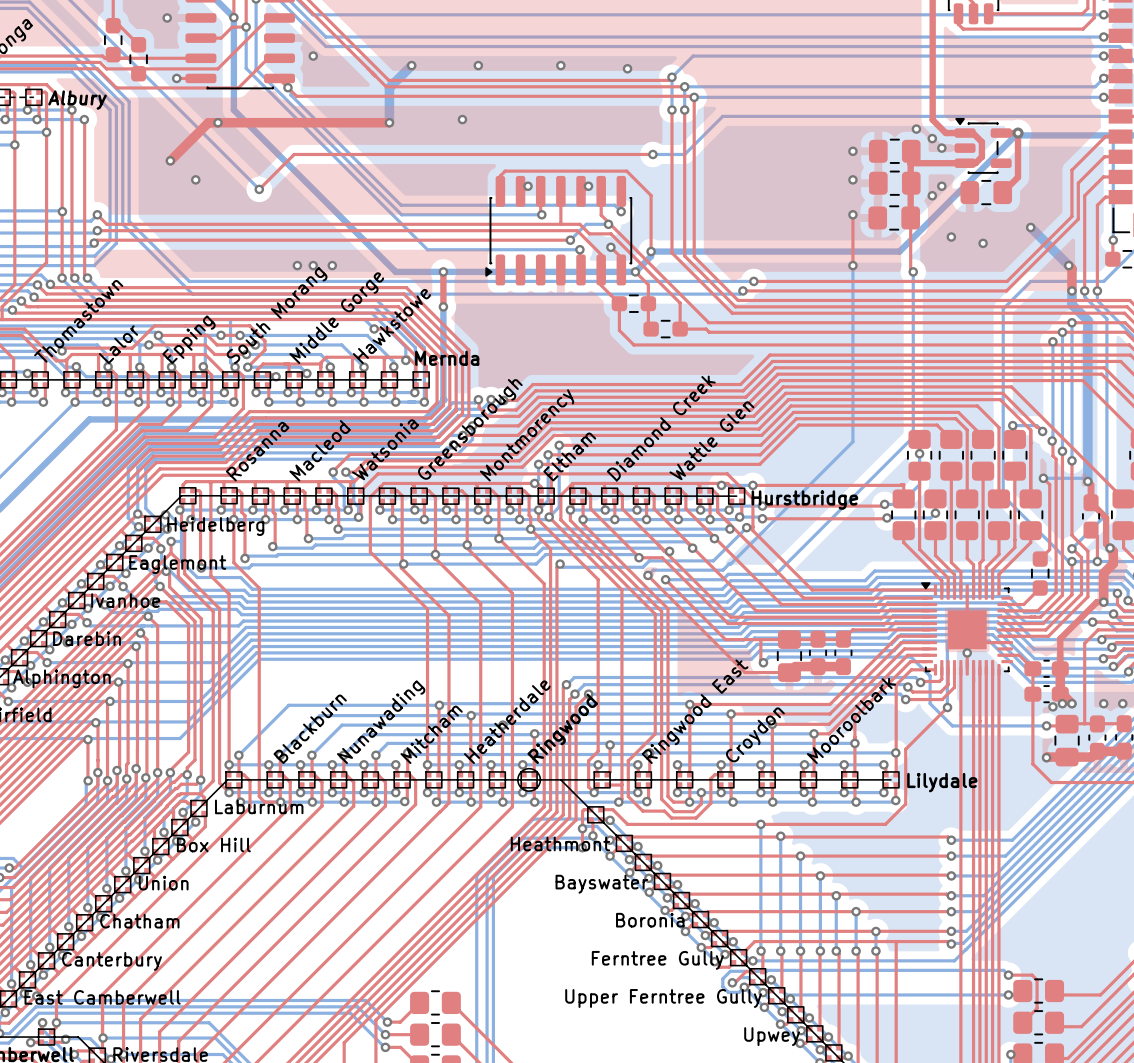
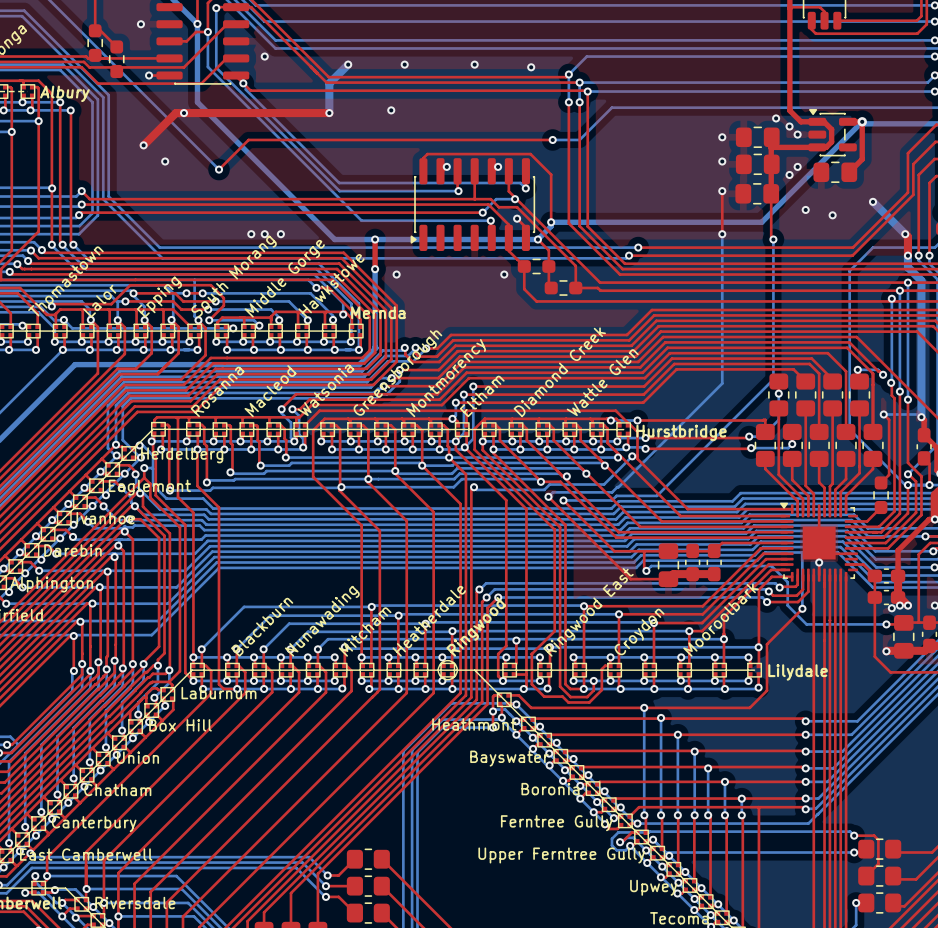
via: none -> (396, 274)
via: none -> (504, 274)

